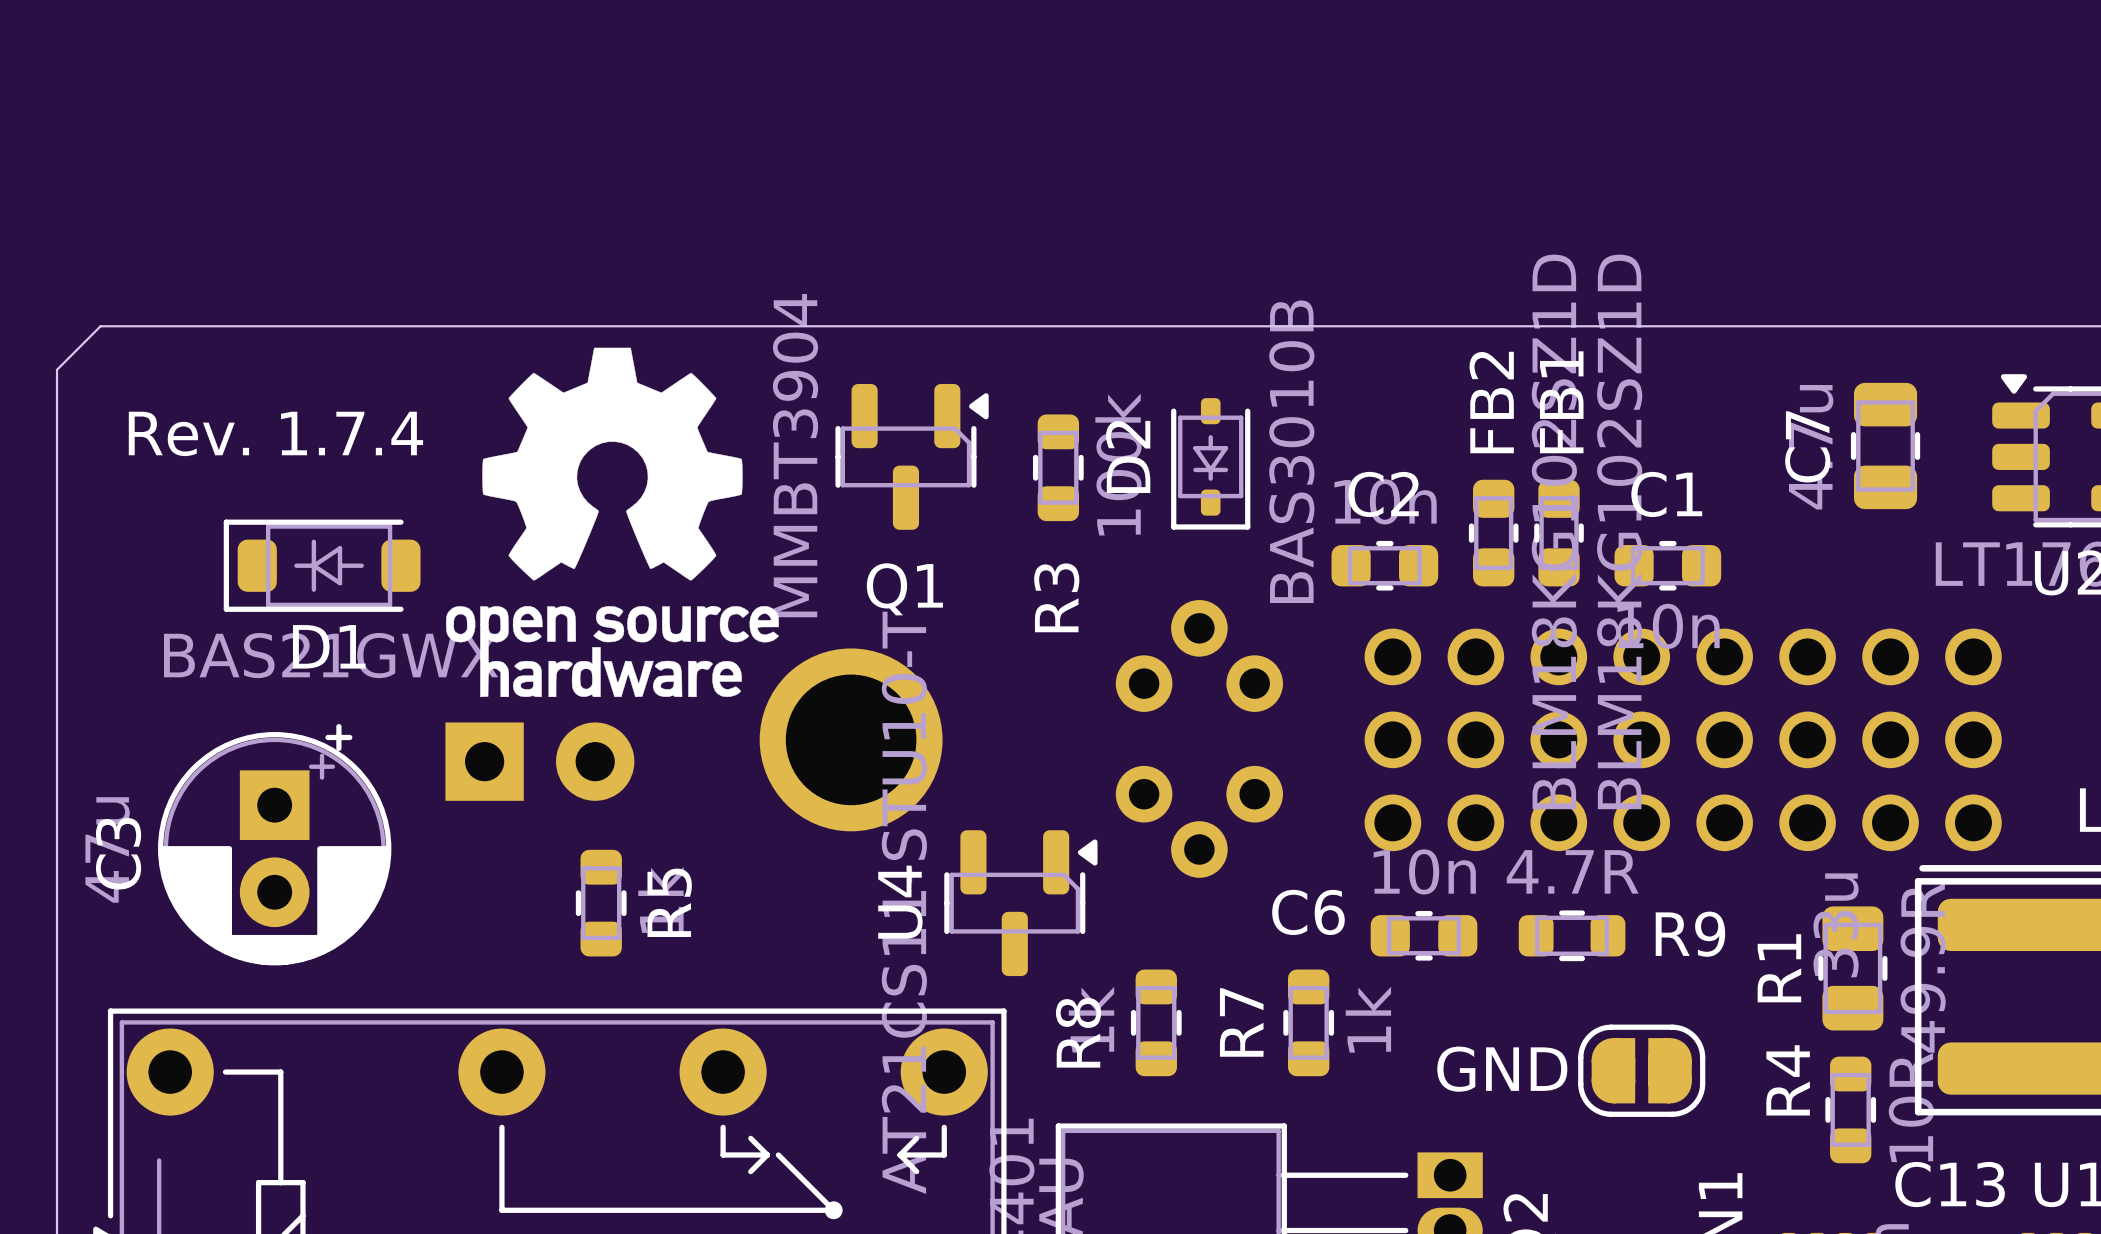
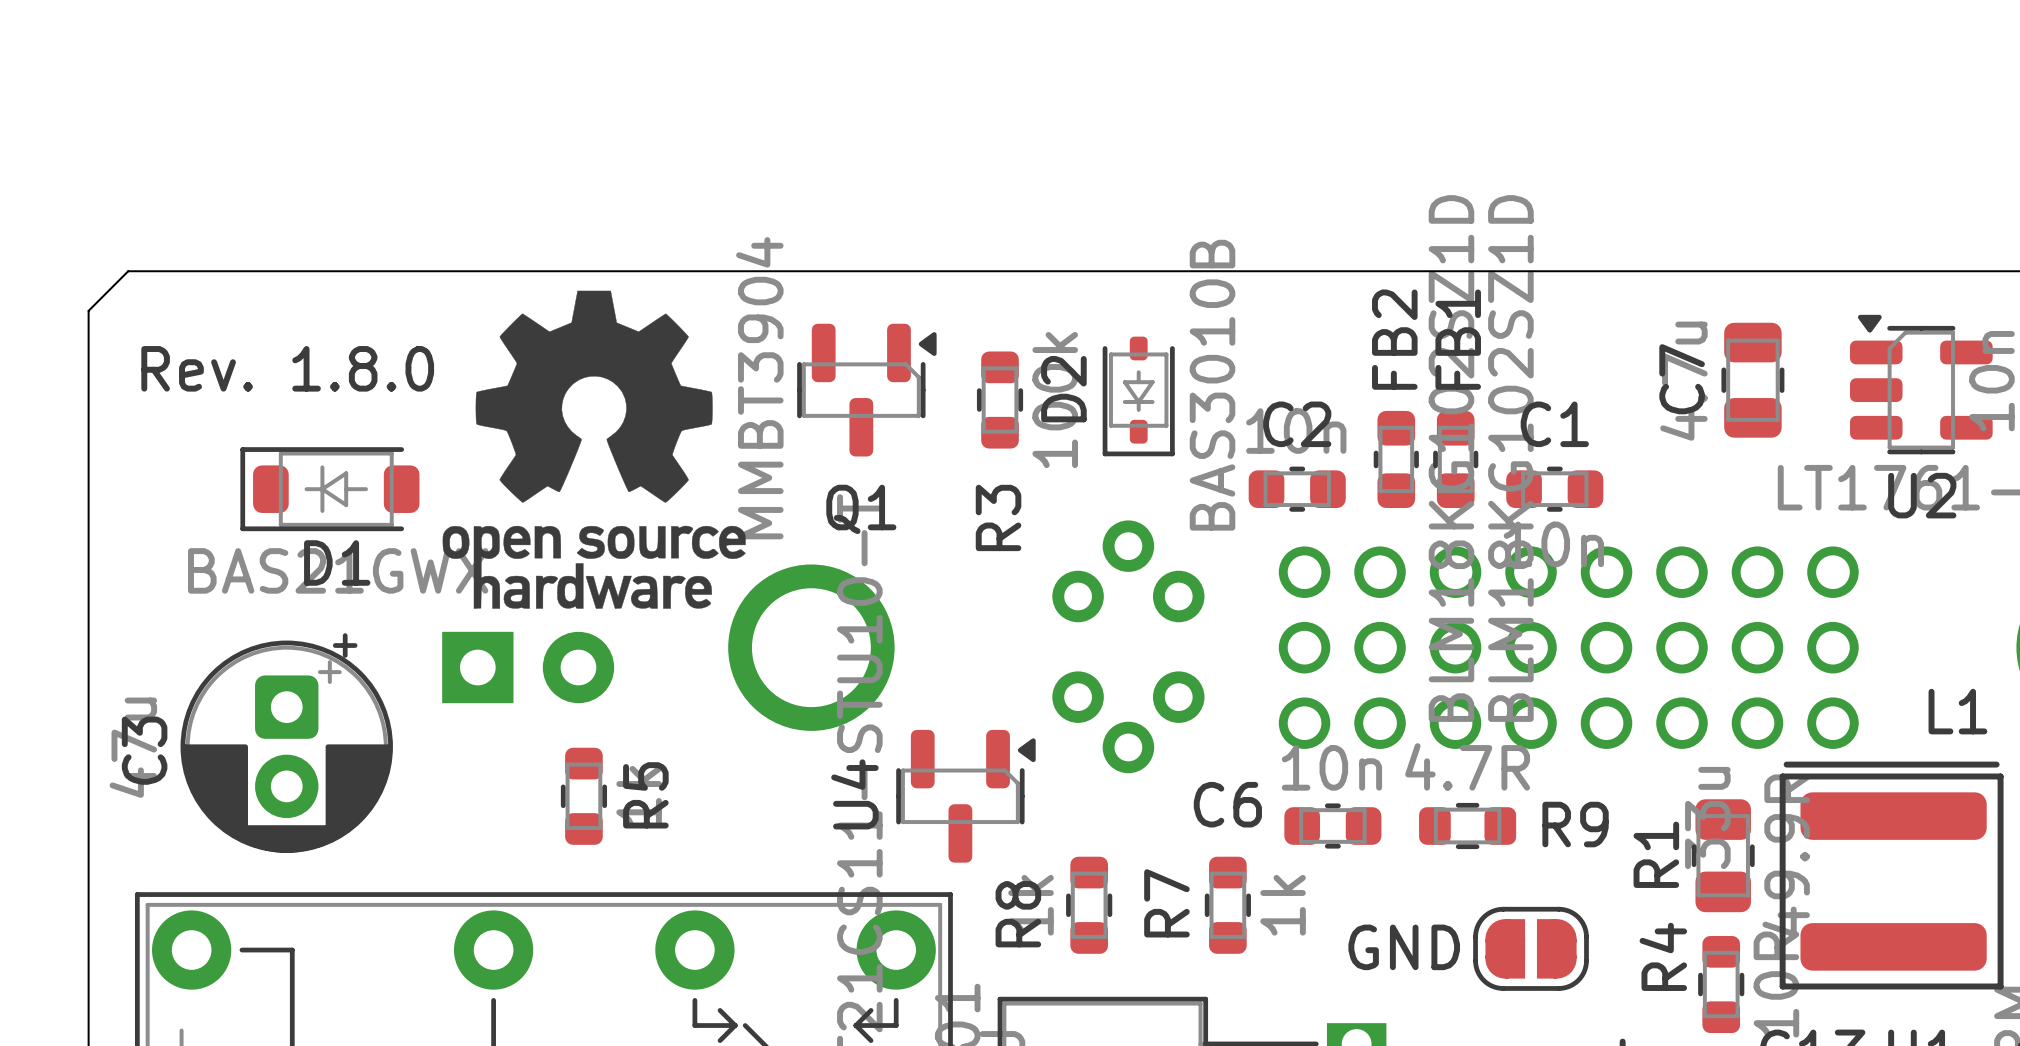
text: Rev. 1.7.4 (275, 433) -> Rev. 1.8.0 (287, 368)
C3 footprint: [158, 723, 392, 966] -> [180, 633, 393, 853]

